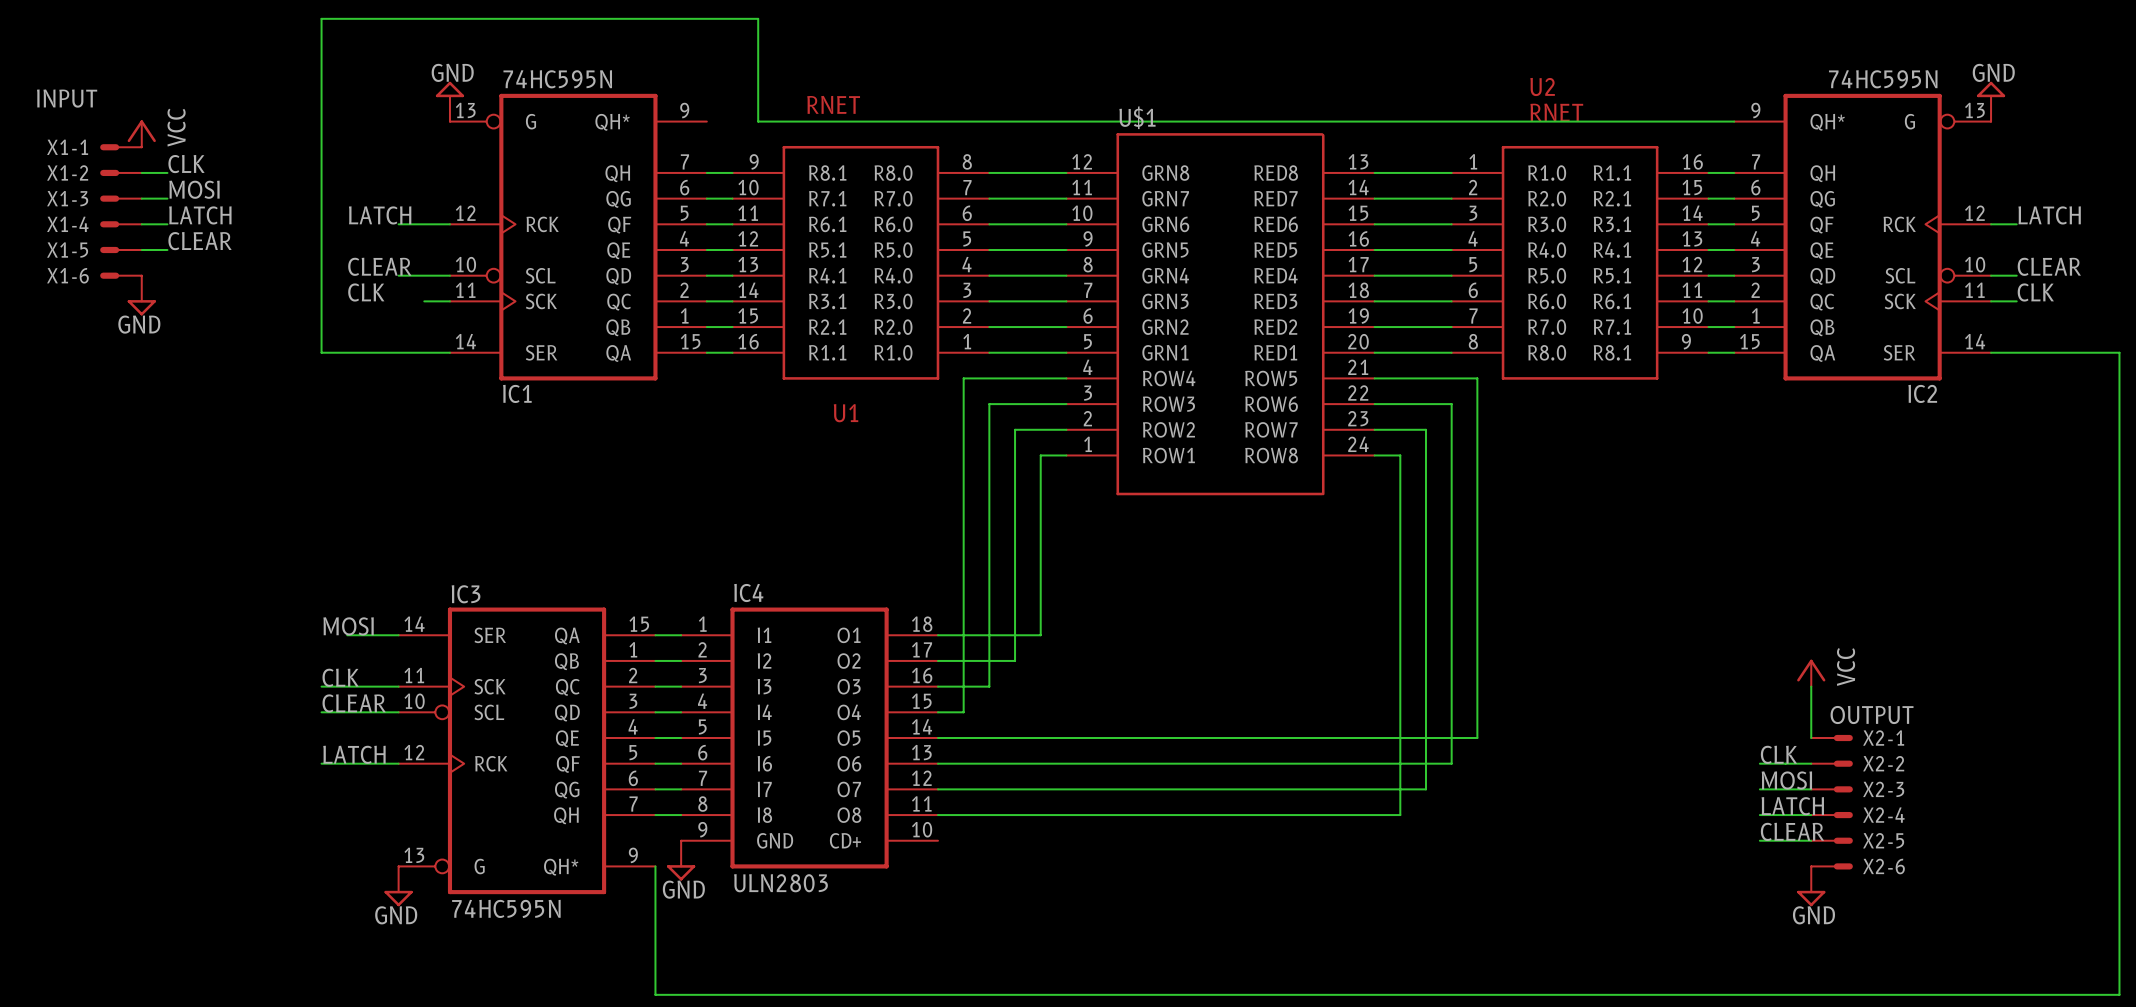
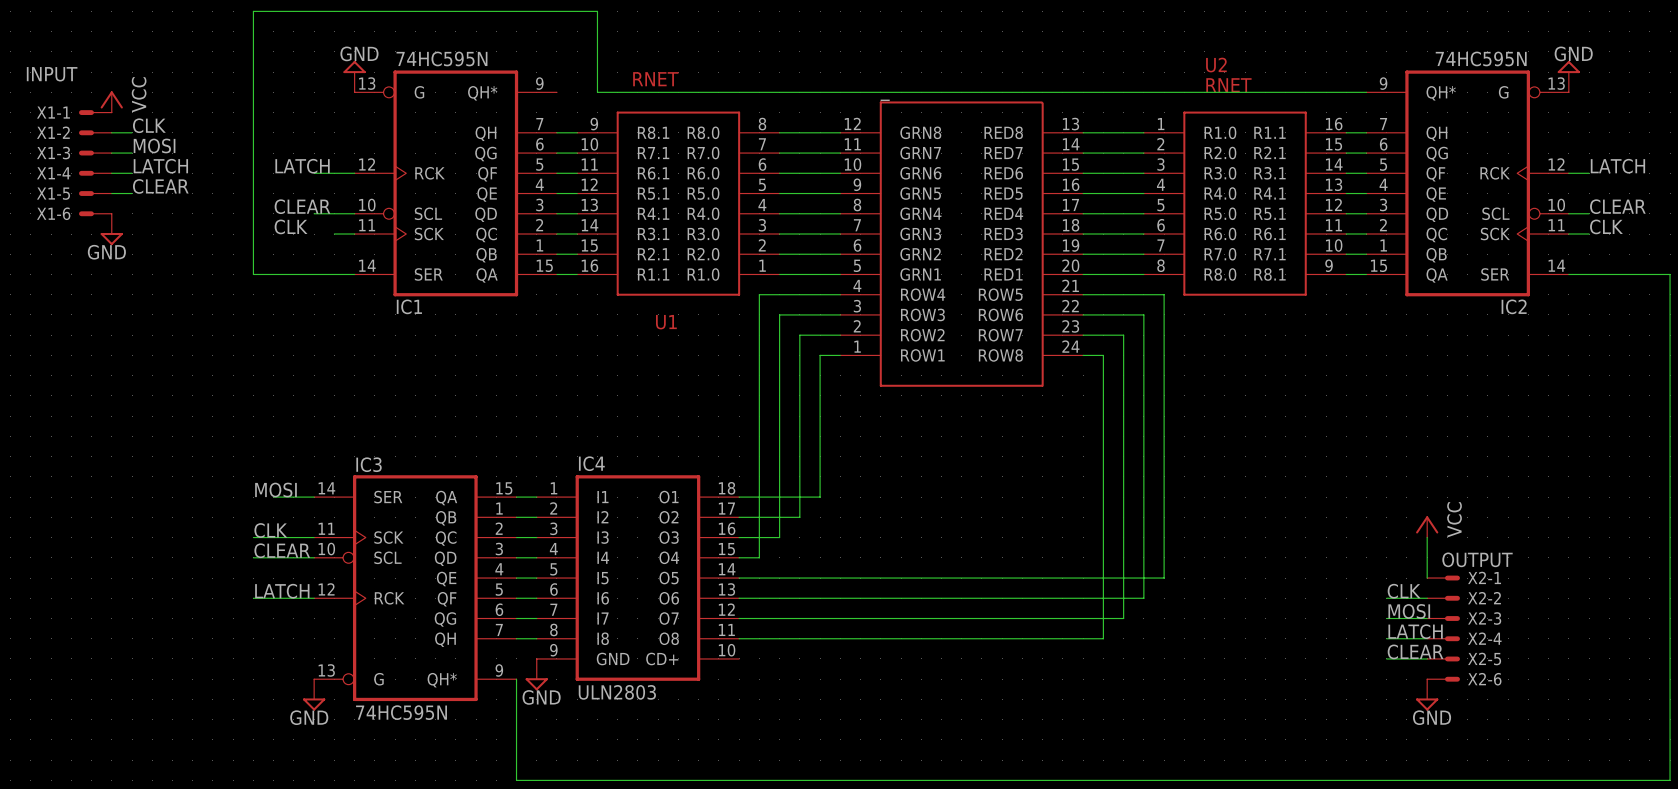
U$1 name: U$1 (1137, 117) -> _ (885, 100)

